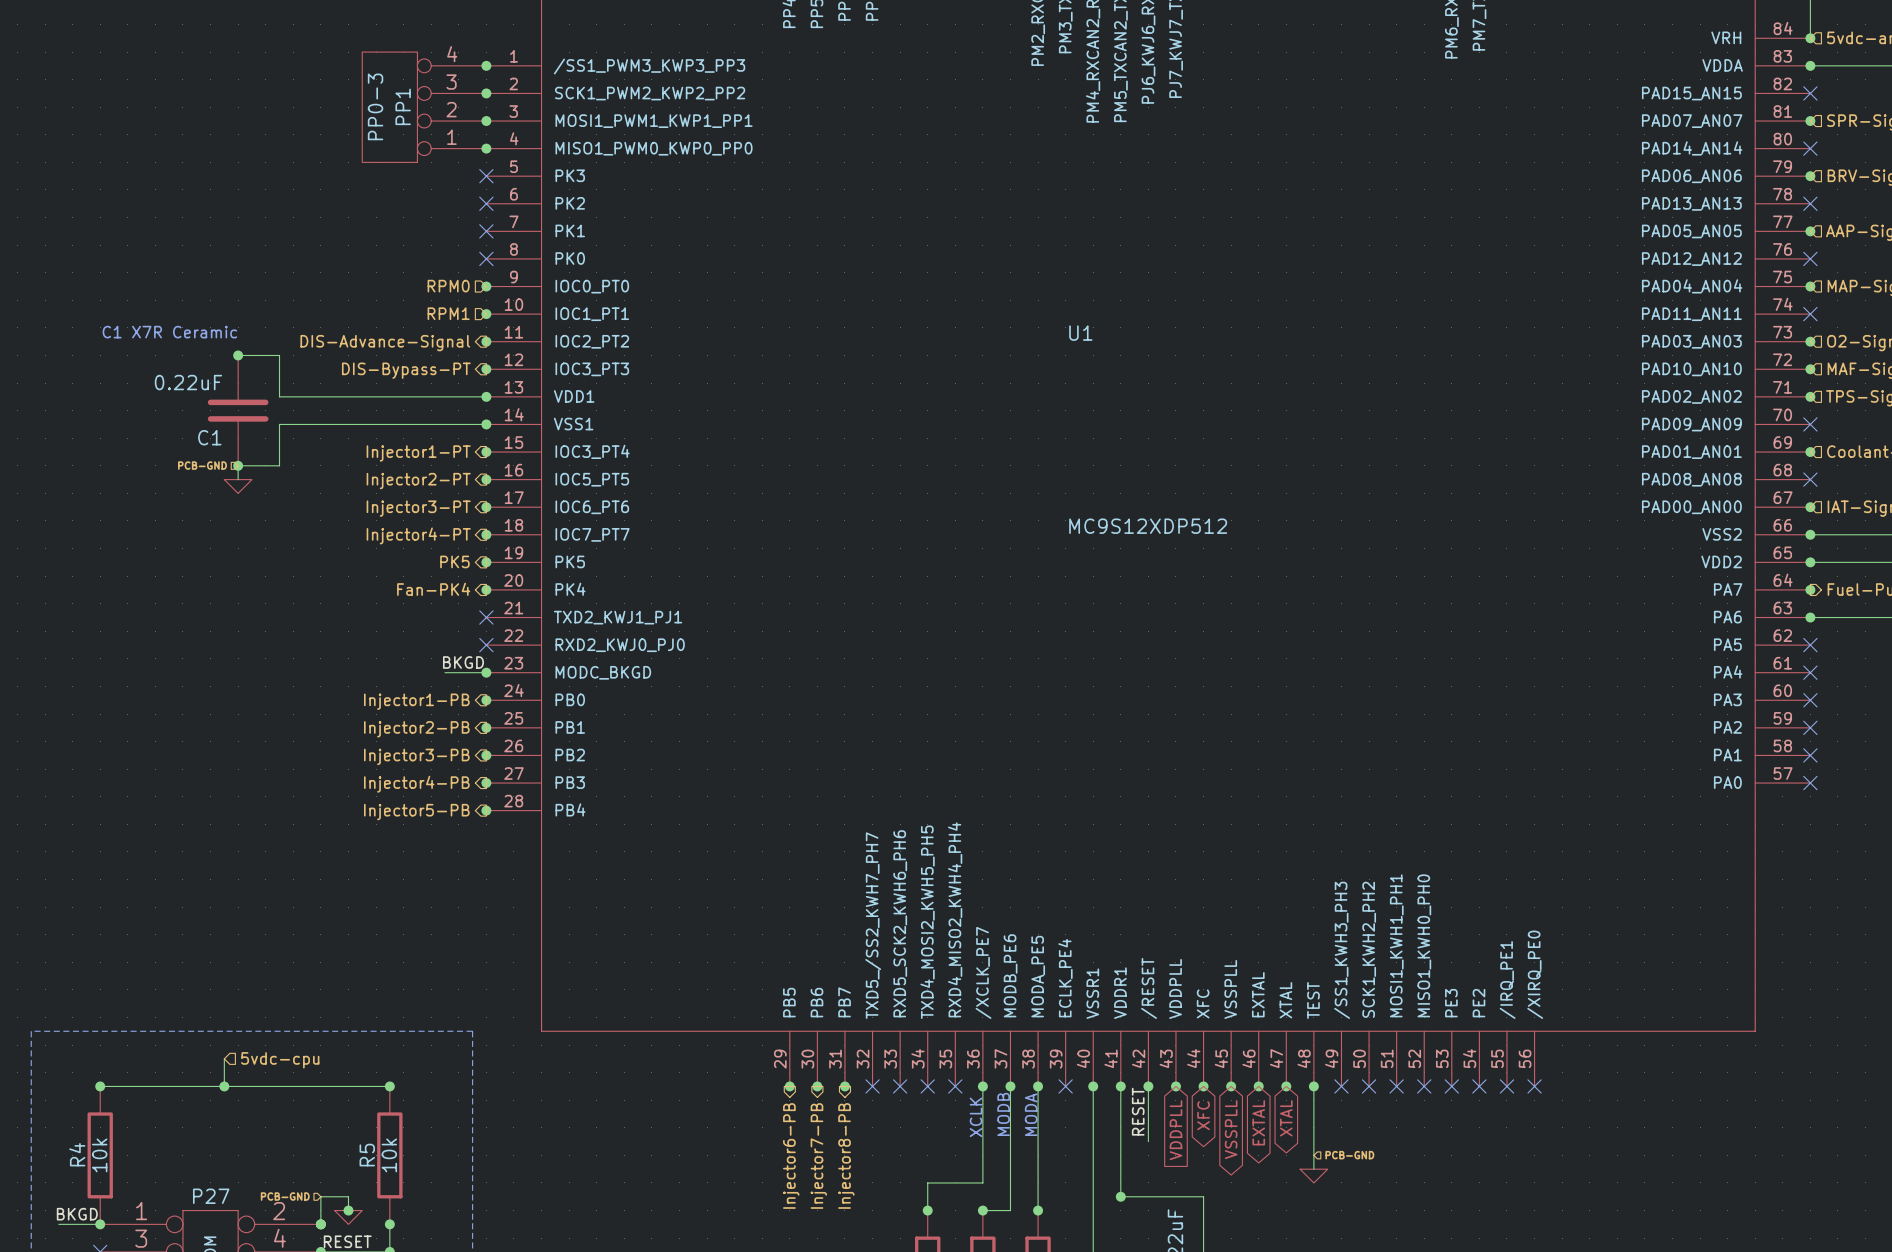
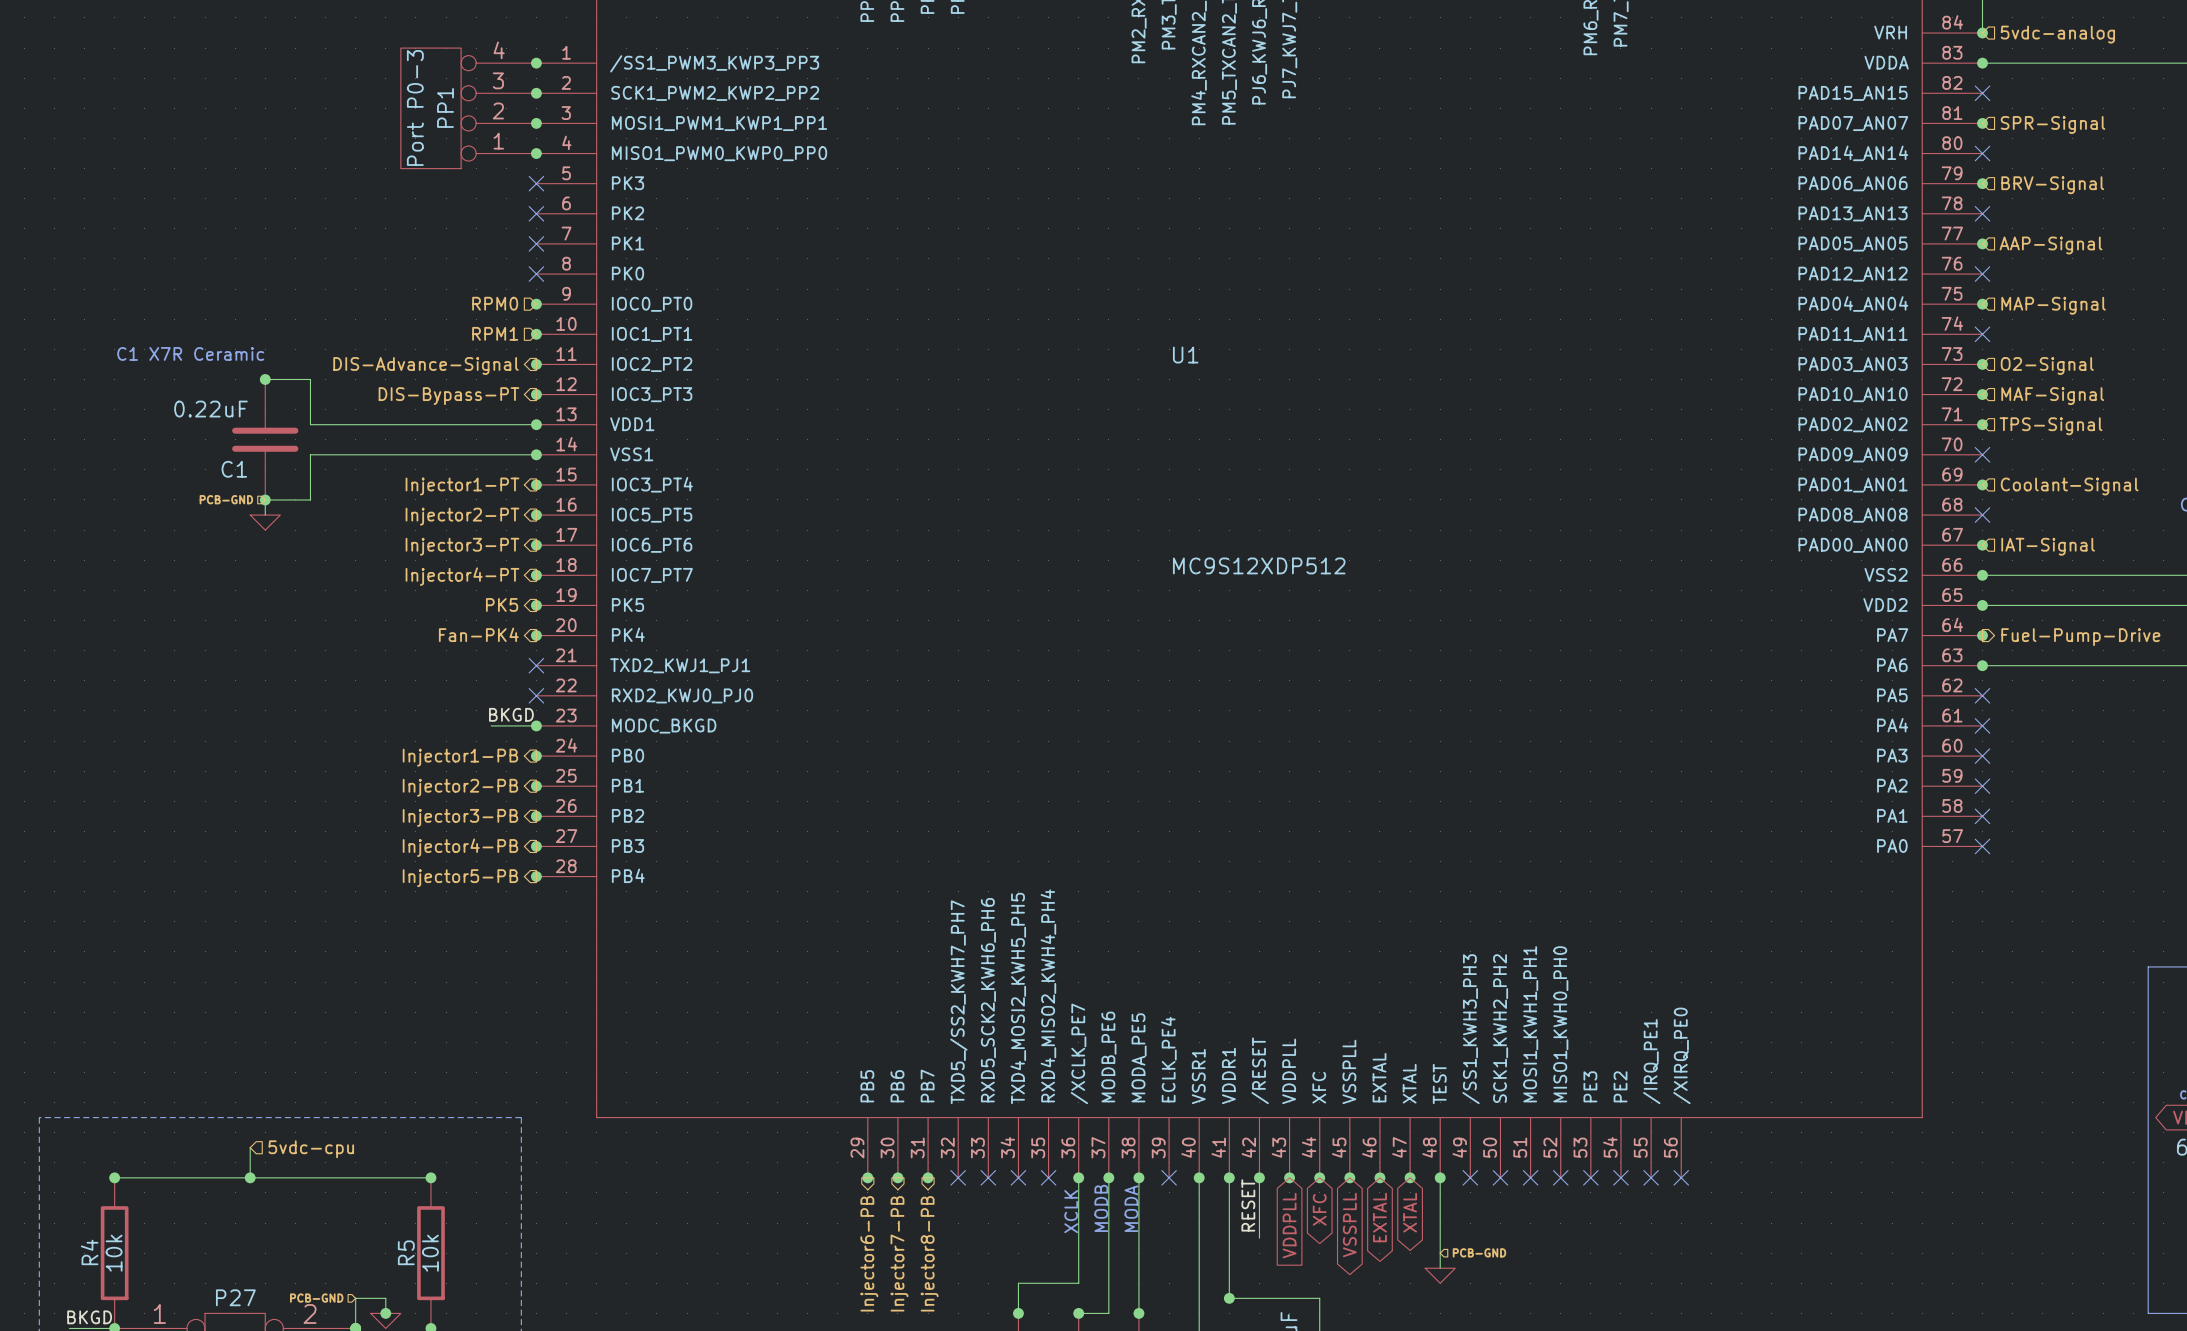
PP1 value: PP0-3 (375, 106) -> Port P0-3 (415, 107)

